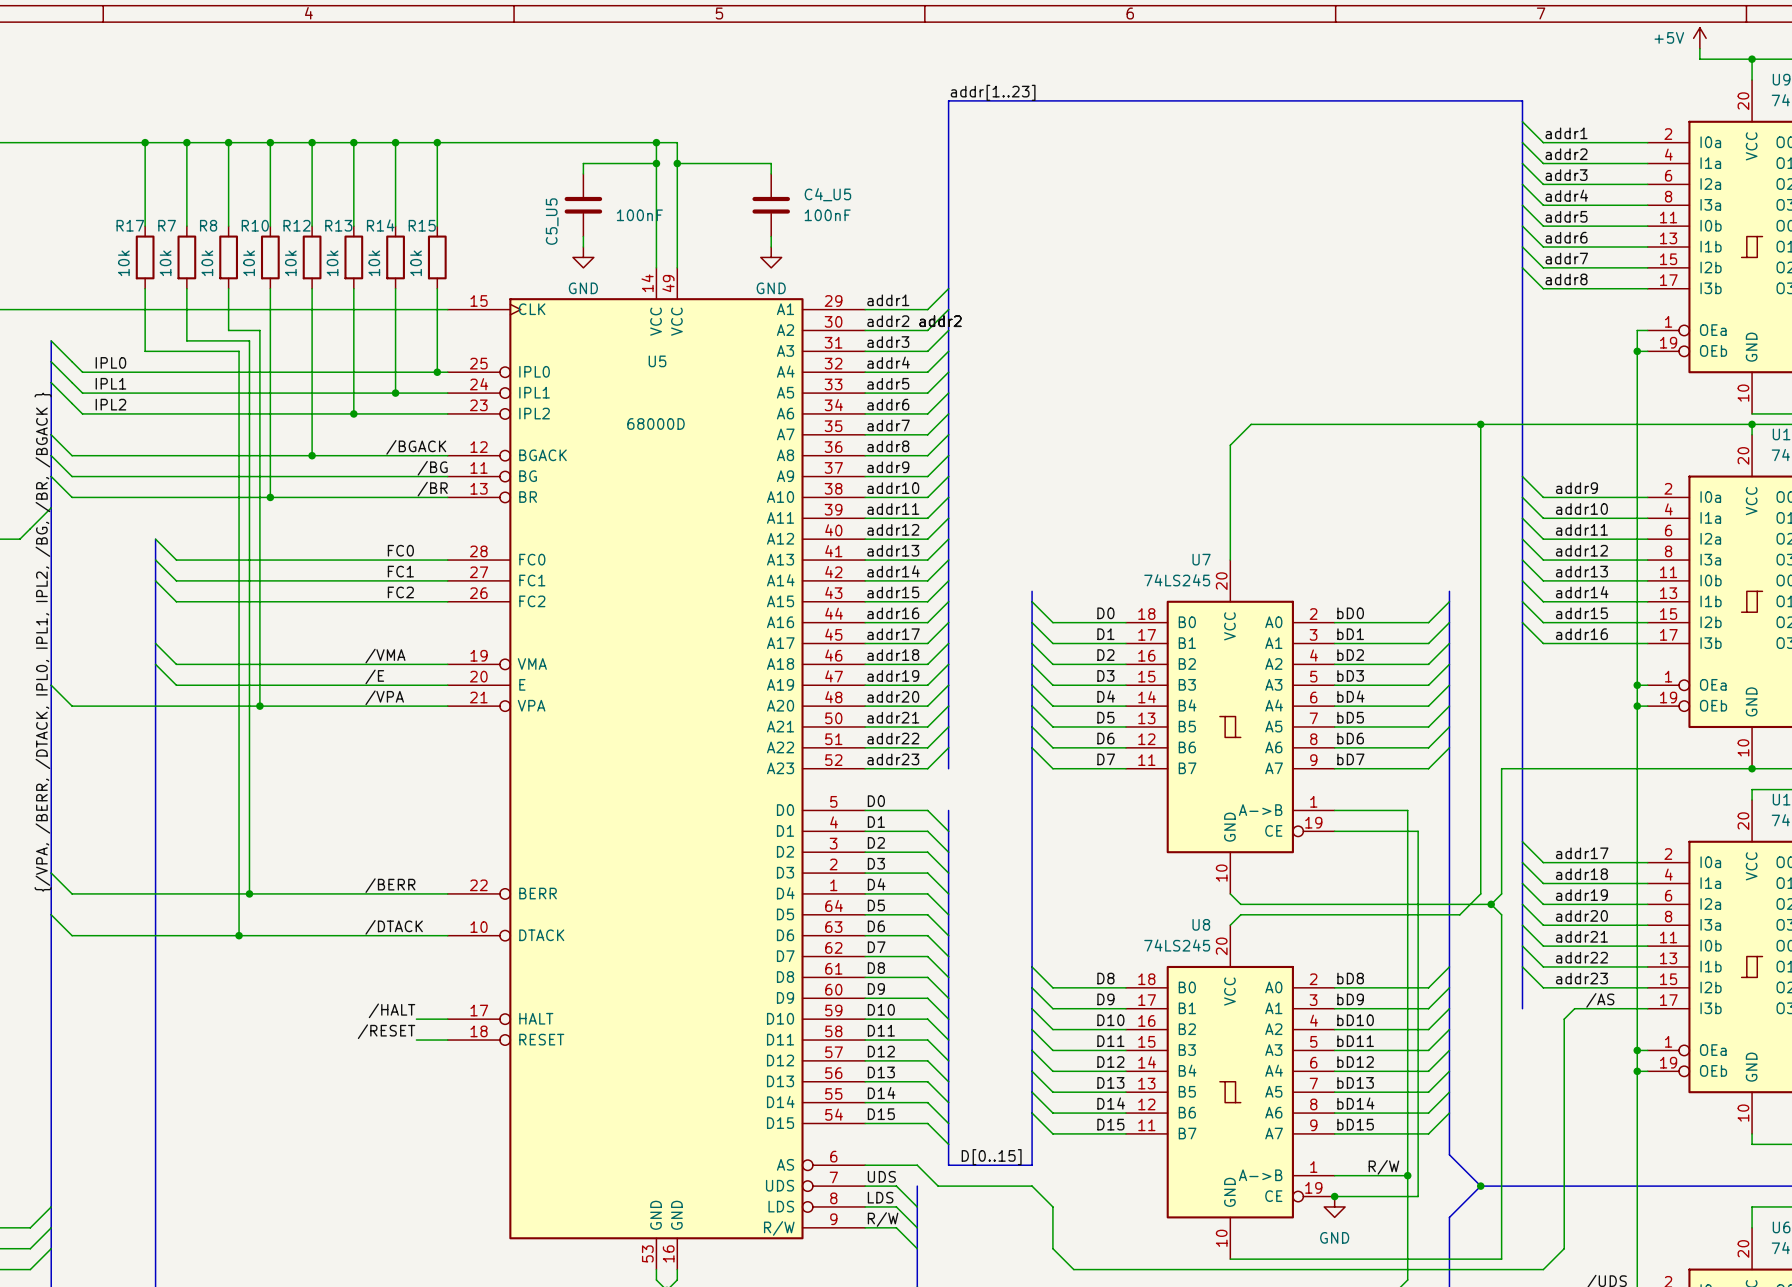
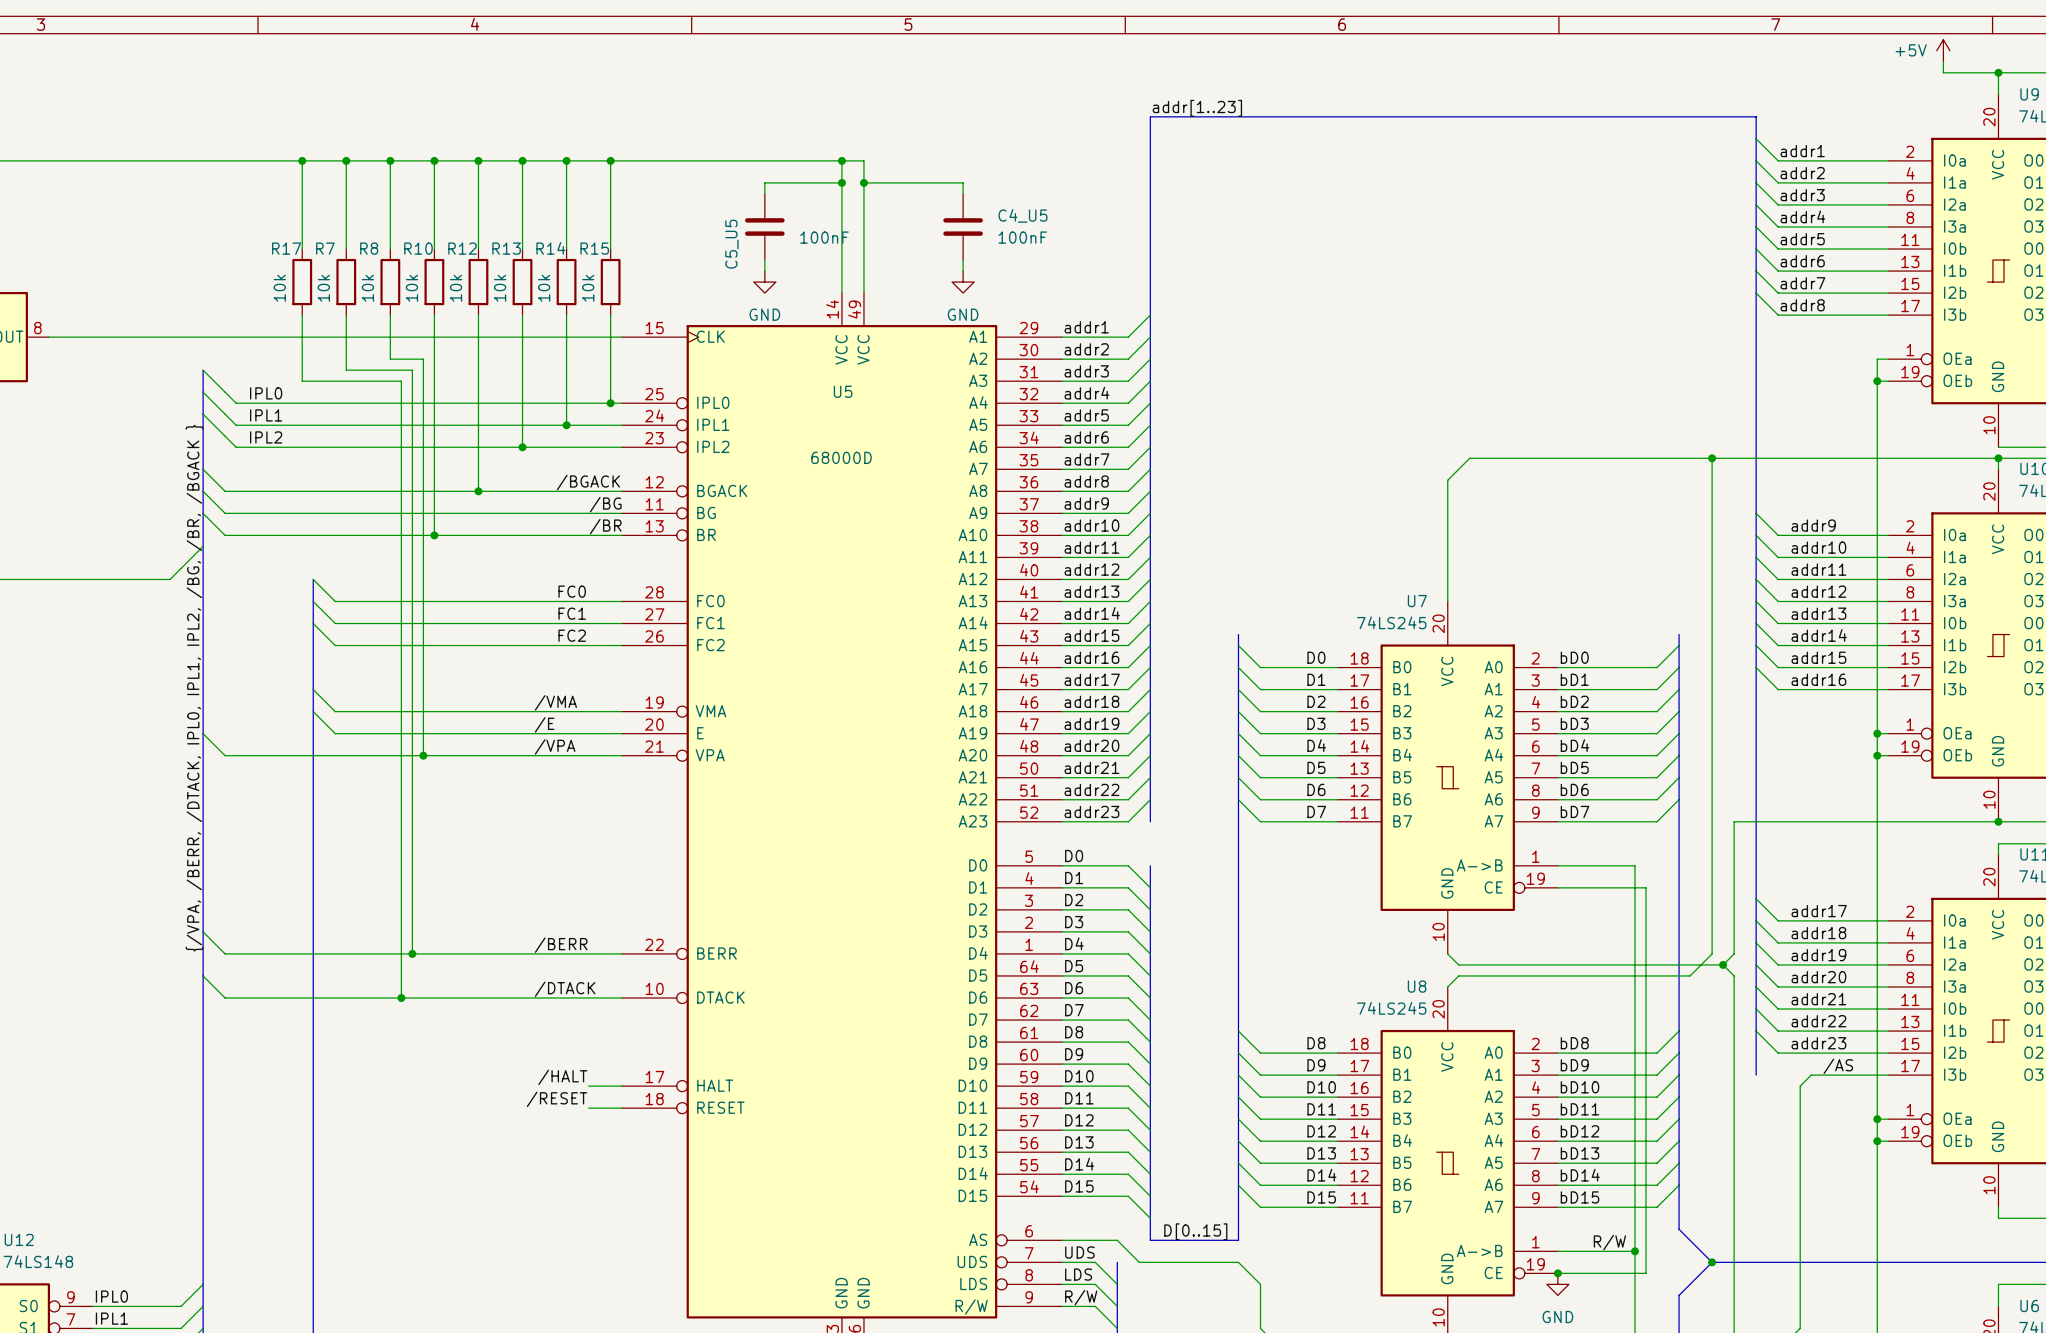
label: addr2 (940, 321) -> none

